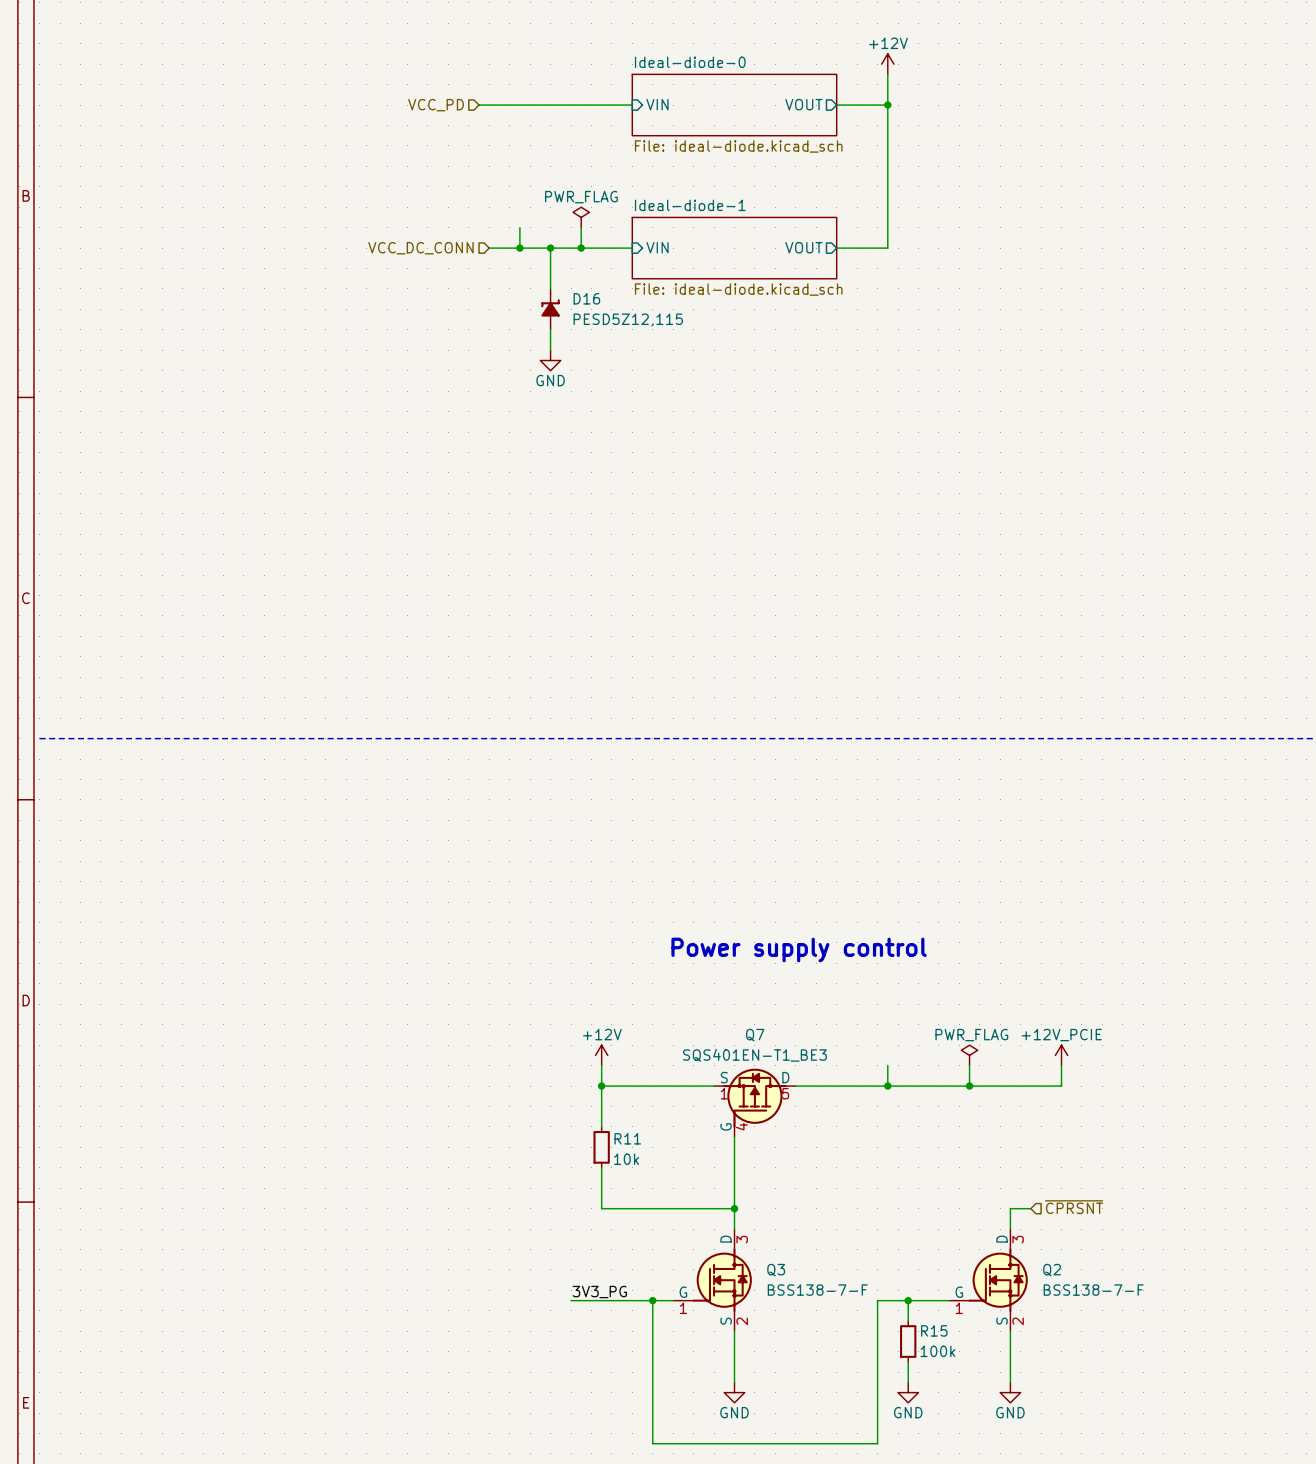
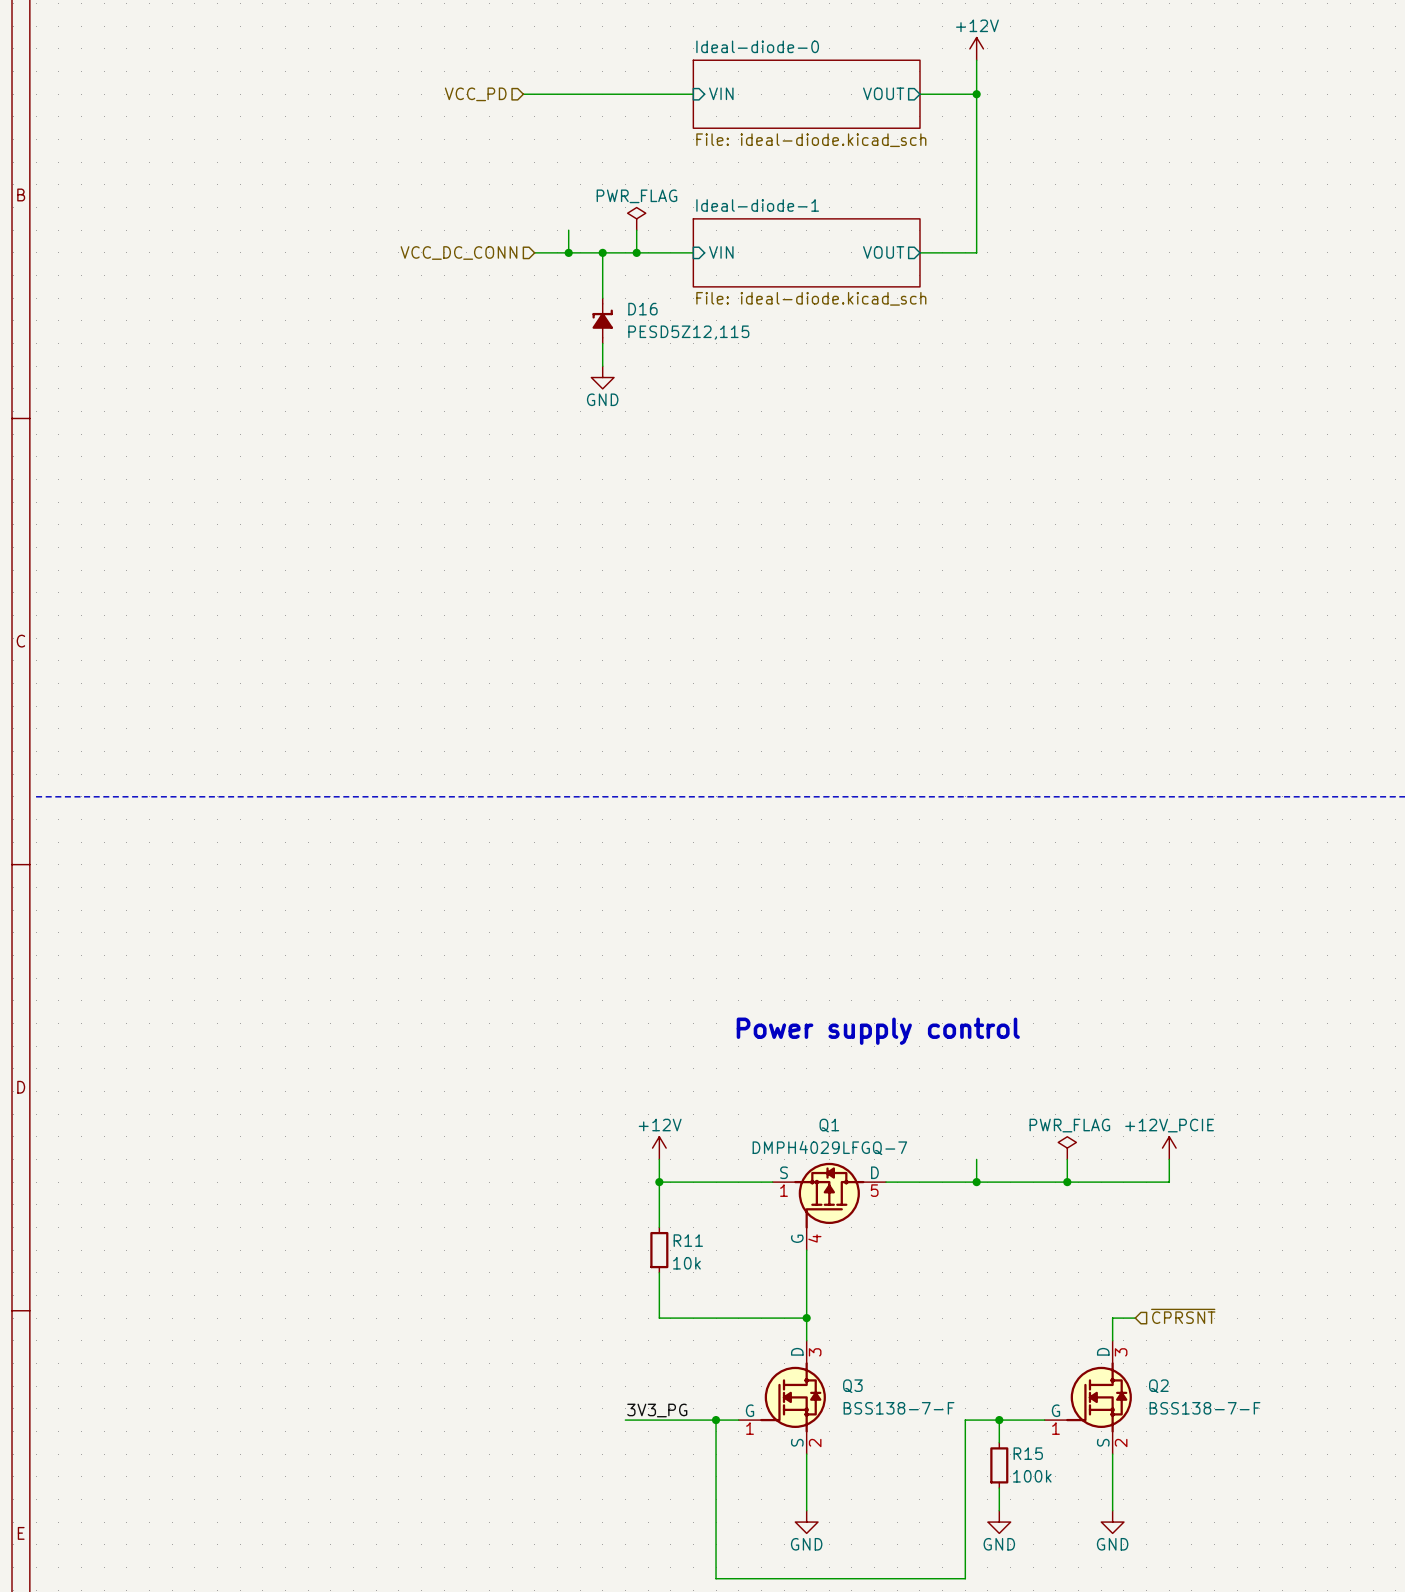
Q7: (754, 1102) -> none
Q1: none -> (829, 1206)

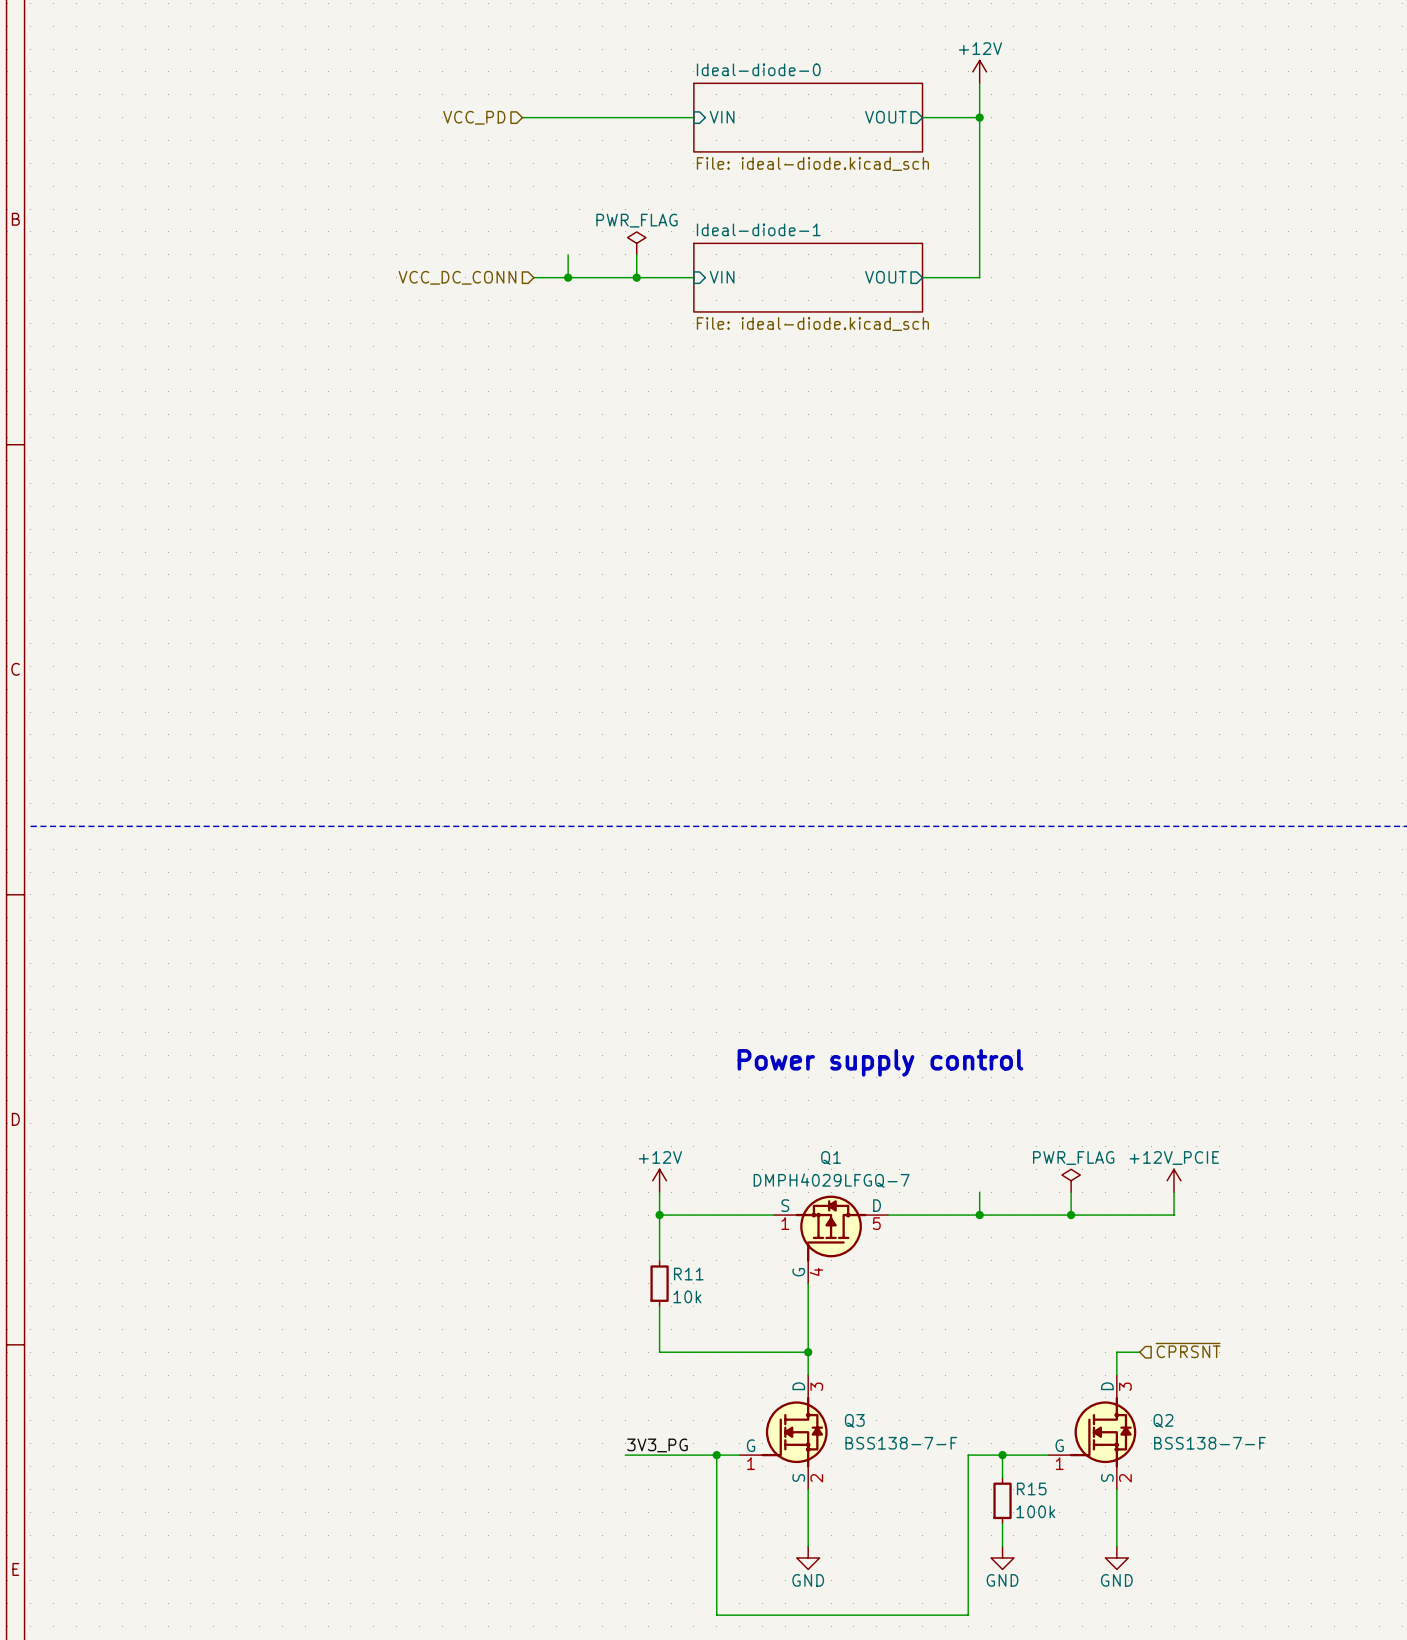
wire: (602, 252) (602, 298) -> none
junction: (602, 252) -> none
D16: (602, 320) -> none
wire: (602, 343) (602, 366) -> none
power symbol: GND (602, 377) -> none

